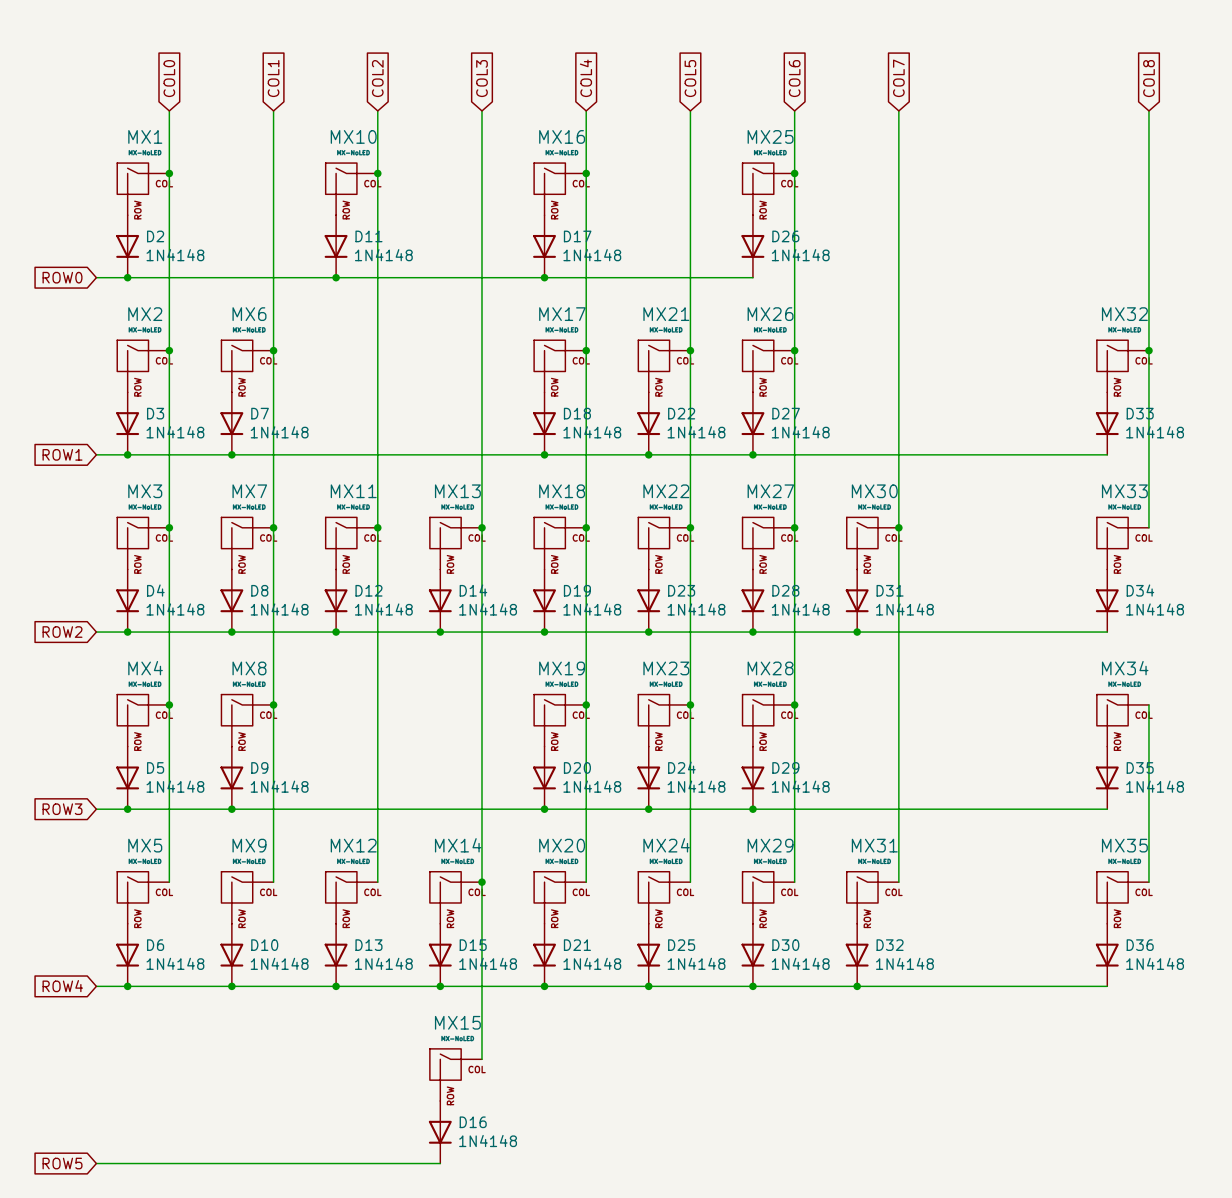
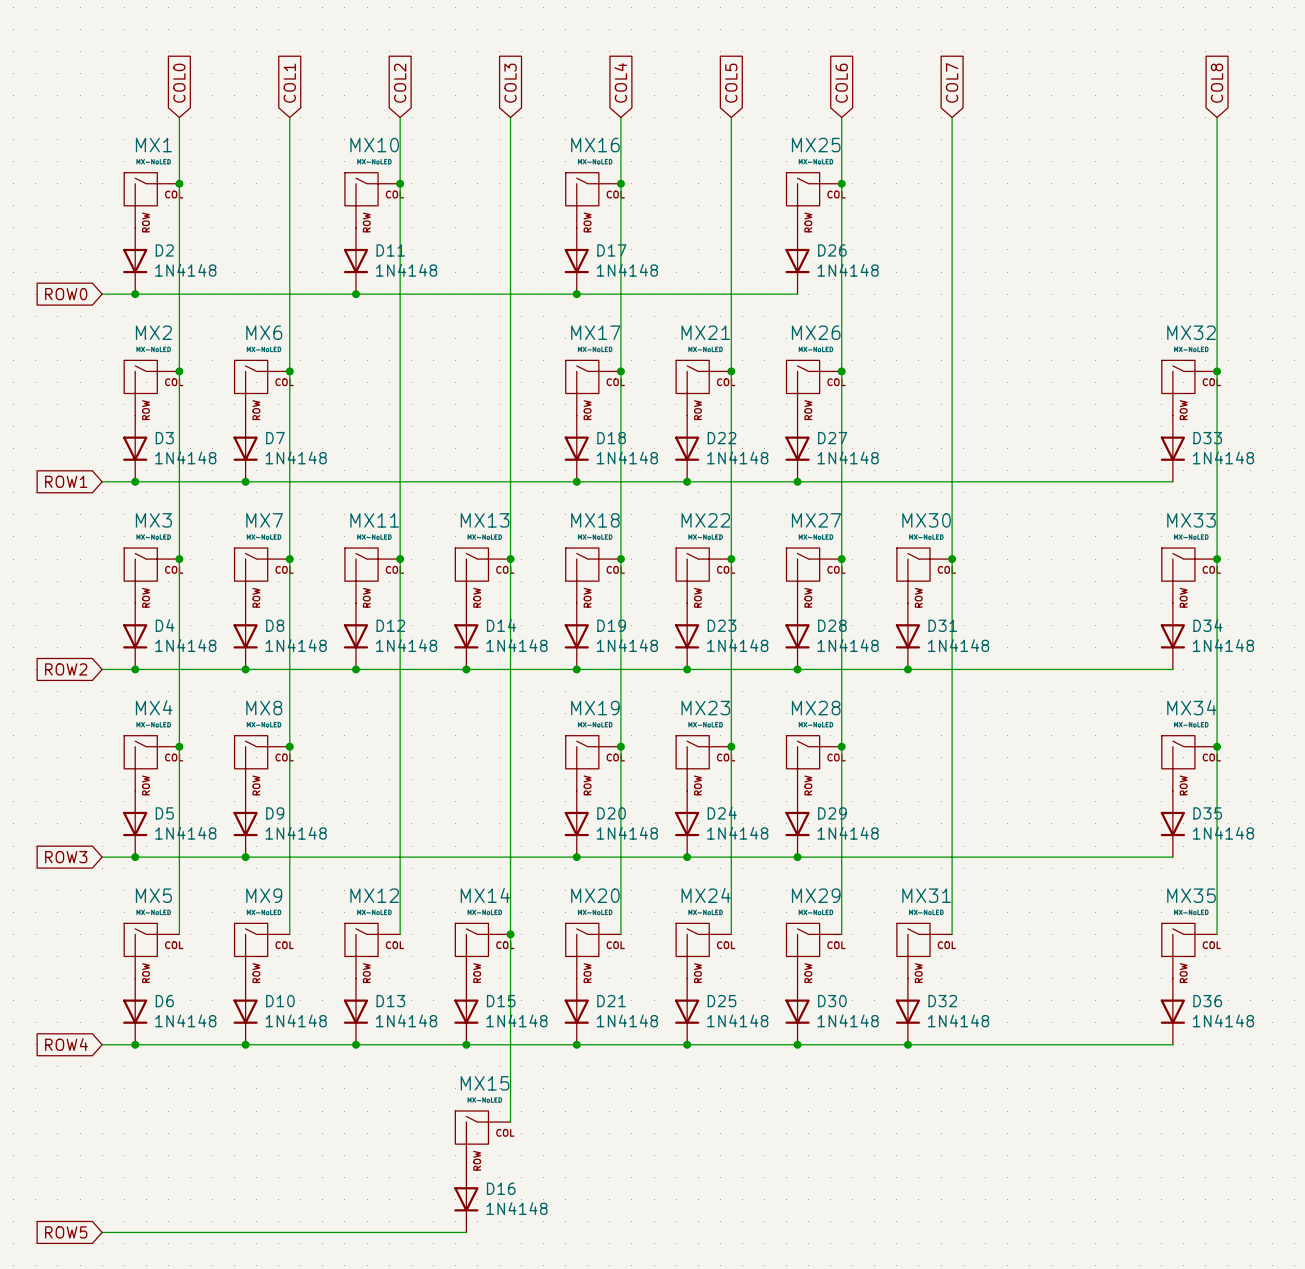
wire: none -> (1217, 559) (1217, 746)
junction: none -> (1217, 559)
junction: none -> (1217, 746)

